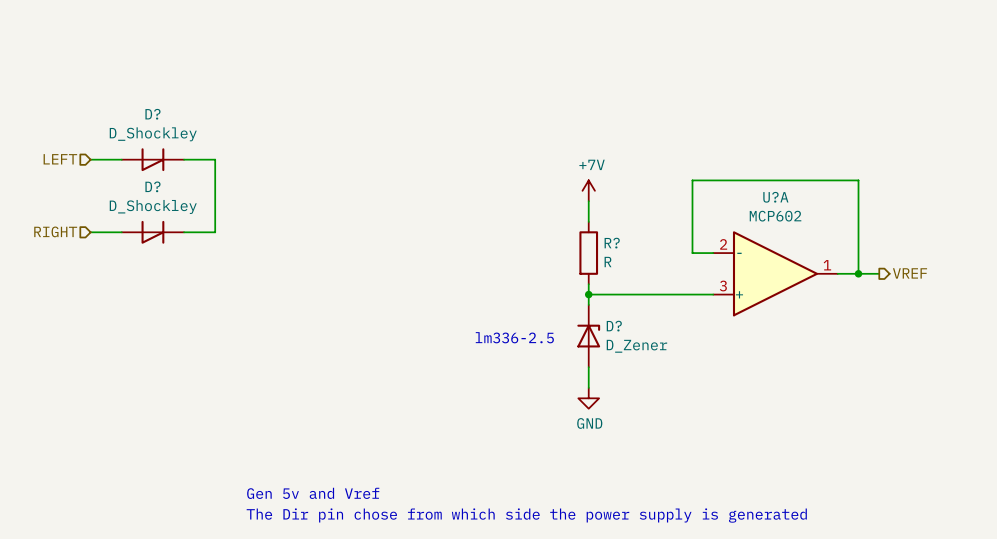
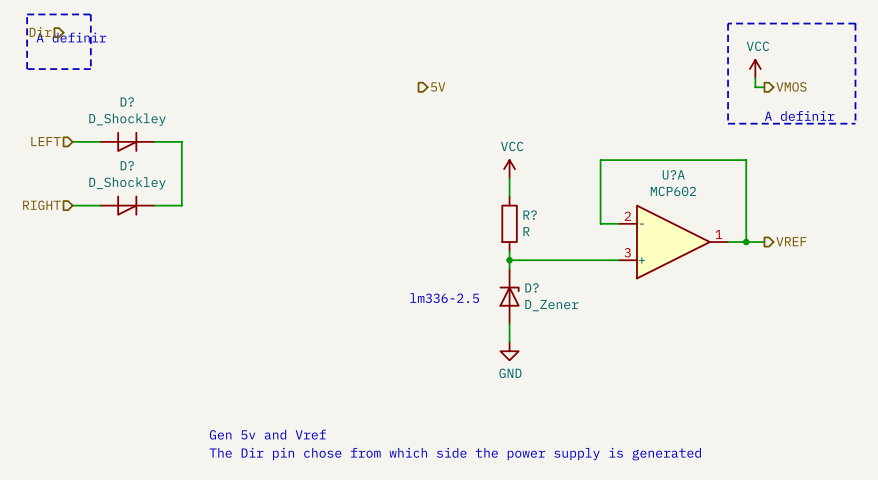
line: none -> (27, 14) (90, 14) (90, 69) (27, 69) (27, 14)
line: none -> (728, 23) (855, 23) (855, 123) (728, 123) (728, 23)
hierarchical label: none -> Dir (40, 31)
text: none -> A definir (71, 37)
power symbol: none -> VCC (755, 69)
wire: none -> (755, 78) (755, 87) (764, 87)
hierarchical label: none -> 5V (438, 87)
hierarchical label: none -> VMOS (791, 86)
text: none -> A definir (799, 115)
power symbol: +7V (588, 190) -> VCC (509, 169)

